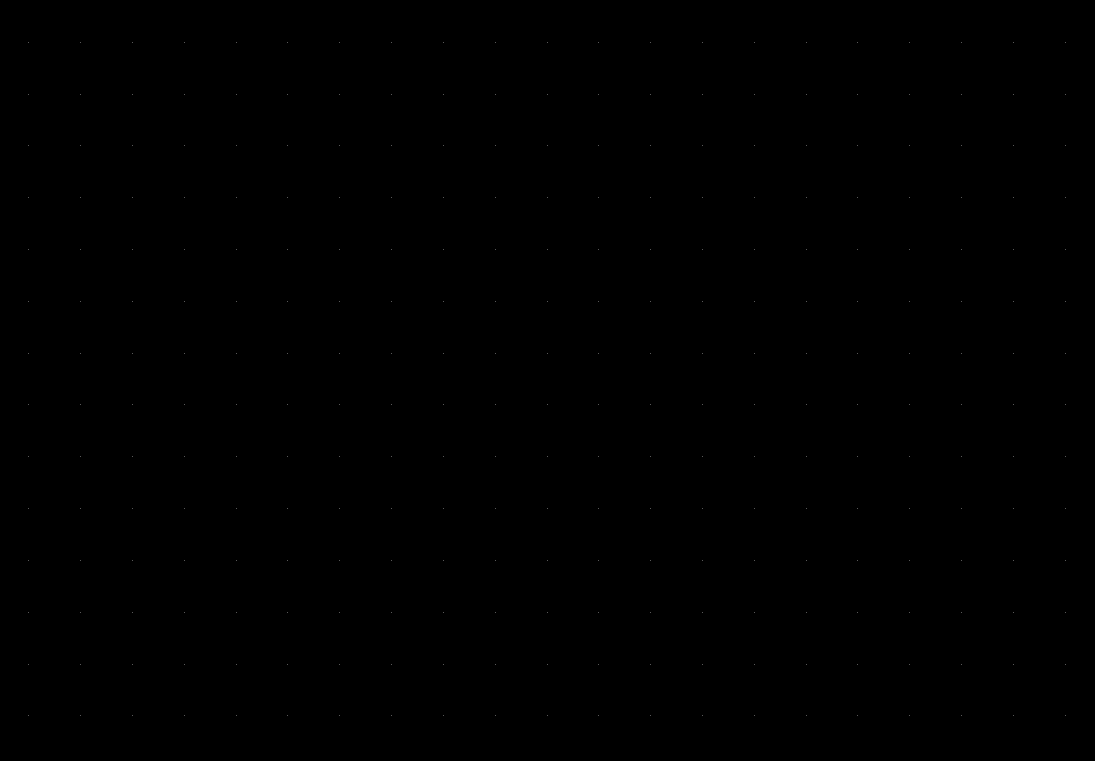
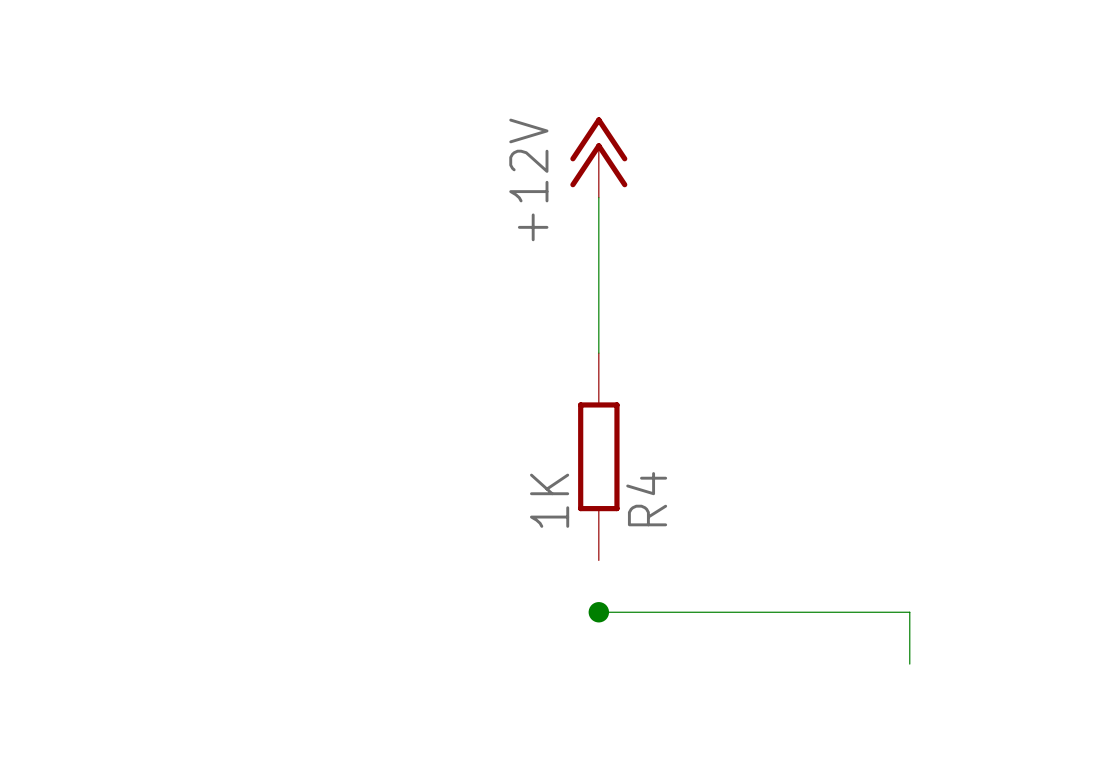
power symbol: none -> +12V (598, 157)
wire: none -> (598, 197) (598, 353)
R4: none -> 1K (598, 456)
wire: none -> (598, 612) (909, 612) (909, 664)
junction: none -> (598, 612)

